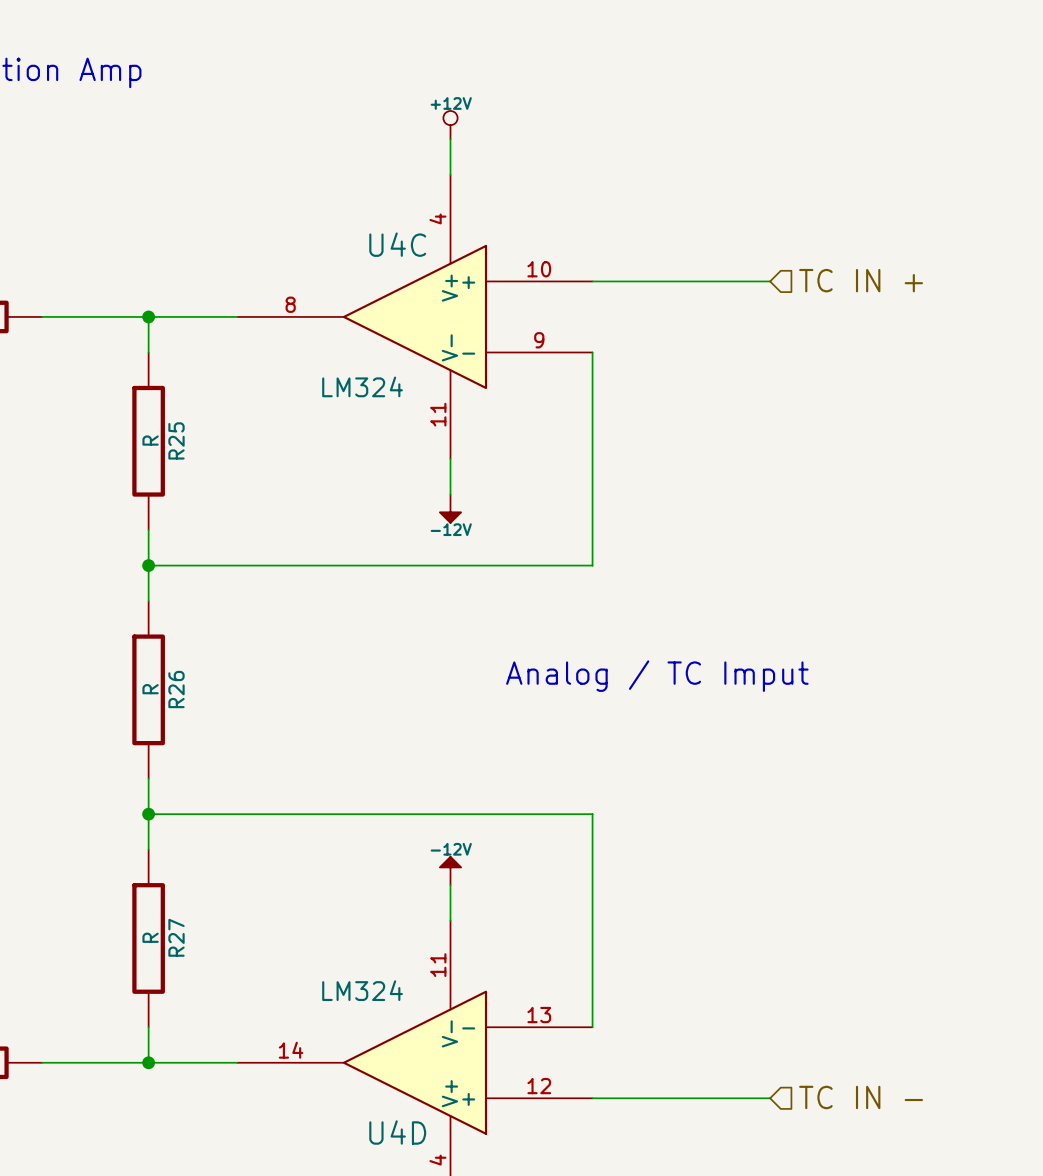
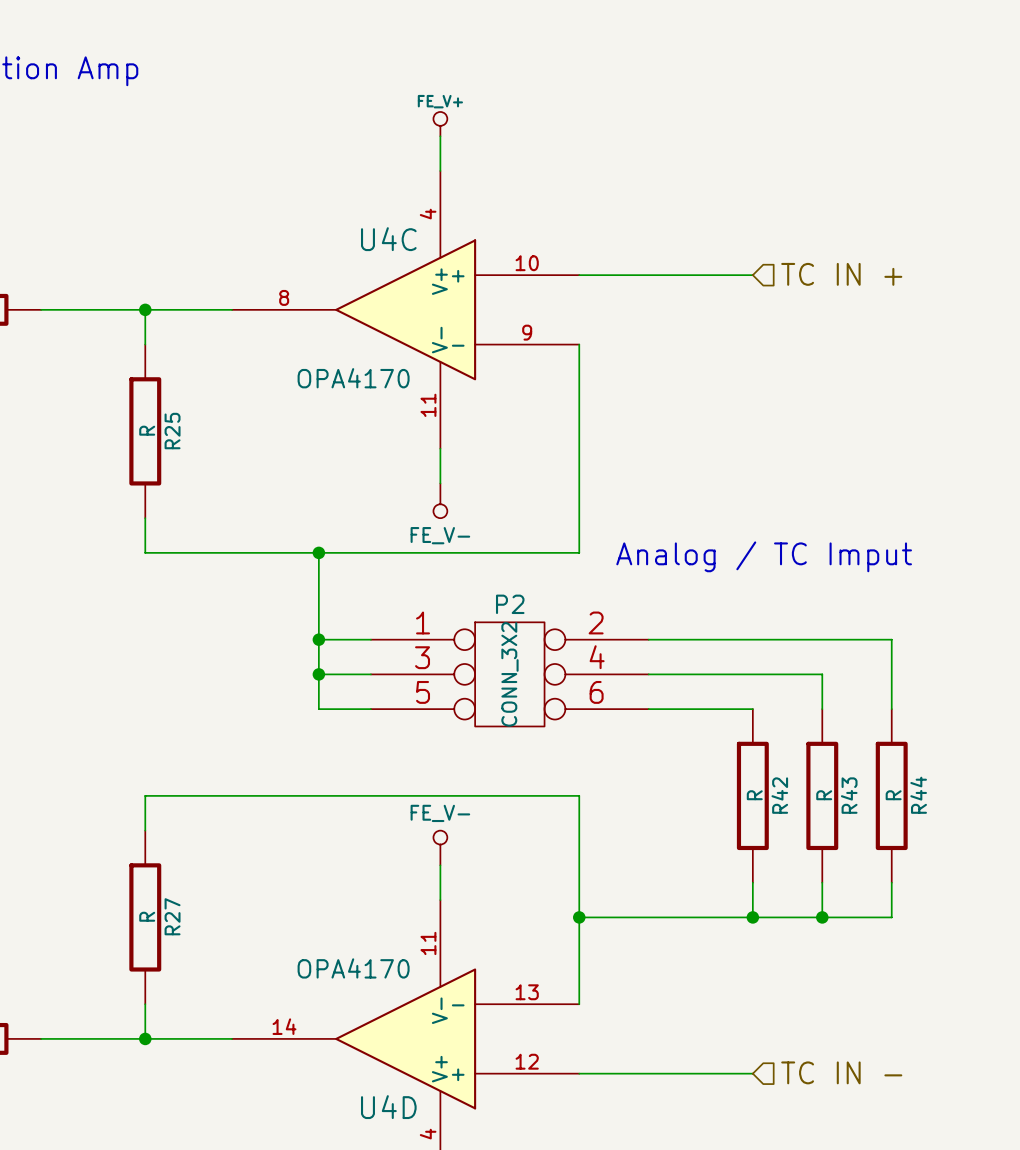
power symbol: +12V (450, 125) -> FE_V+ (440, 124)
U4C value: LM324 (362, 386) -> OPA4170 (353, 378)
power symbol: -12V (450, 508) -> FE_V- (440, 500)
wire: (148, 565) (148, 601) -> none
junction: (148, 565) -> none
wire: none -> (318, 552) (318, 709) (370, 709)
junction: none -> (318, 552)
wire: none -> (318, 639) (370, 639)
junction: none -> (318, 639)
wire: none -> (648, 639) (891, 639) (891, 709)
text position: Analog / TC Imput (657, 676) -> Analog / TC Imput (764, 556)
R26: R (148, 689) -> none
wire: none -> (318, 674) (370, 674)
junction: none -> (318, 674)
P2: none -> CONN_3X2 (509, 674)
wire: none -> (648, 674) (822, 674) (822, 709)
wire: none -> (648, 709) (752, 709)
wire: (148, 778) (148, 814) -> none
junction: (148, 814) -> none
R42: none -> R (752, 795)
R43: none -> R (822, 795)
R44: none -> R (891, 795)
power symbol: -12V (450, 870) -> FE_V- (440, 847)
wire: none -> (752, 882) (752, 917)
wire: none -> (822, 882) (822, 917)
wire: none -> (891, 882) (891, 917) (579, 917)
junction: none -> (579, 917)
junction: none -> (752, 917)
junction: none -> (822, 917)
U4D value: LM324 (362, 990) -> OPA4170 (353, 968)

